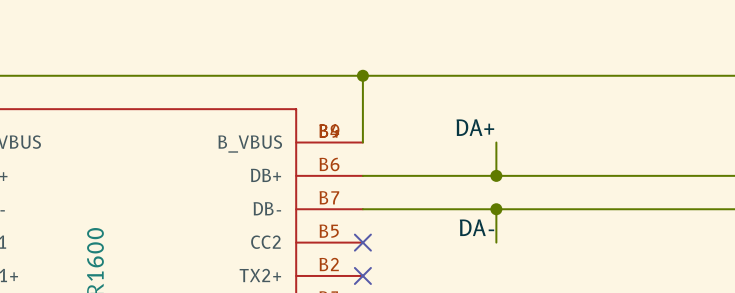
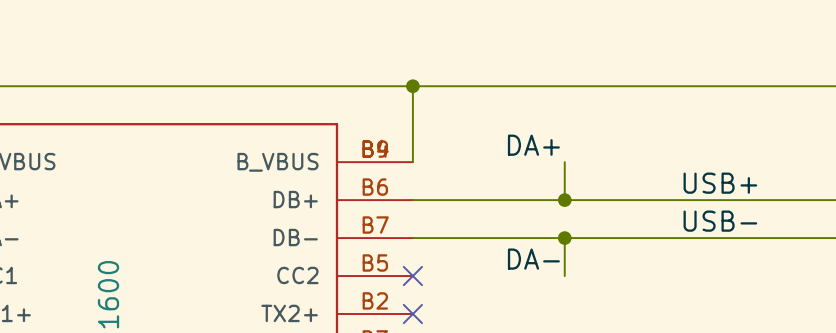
label: none -> USB+ (720, 183)
label: none -> USB- (720, 221)

